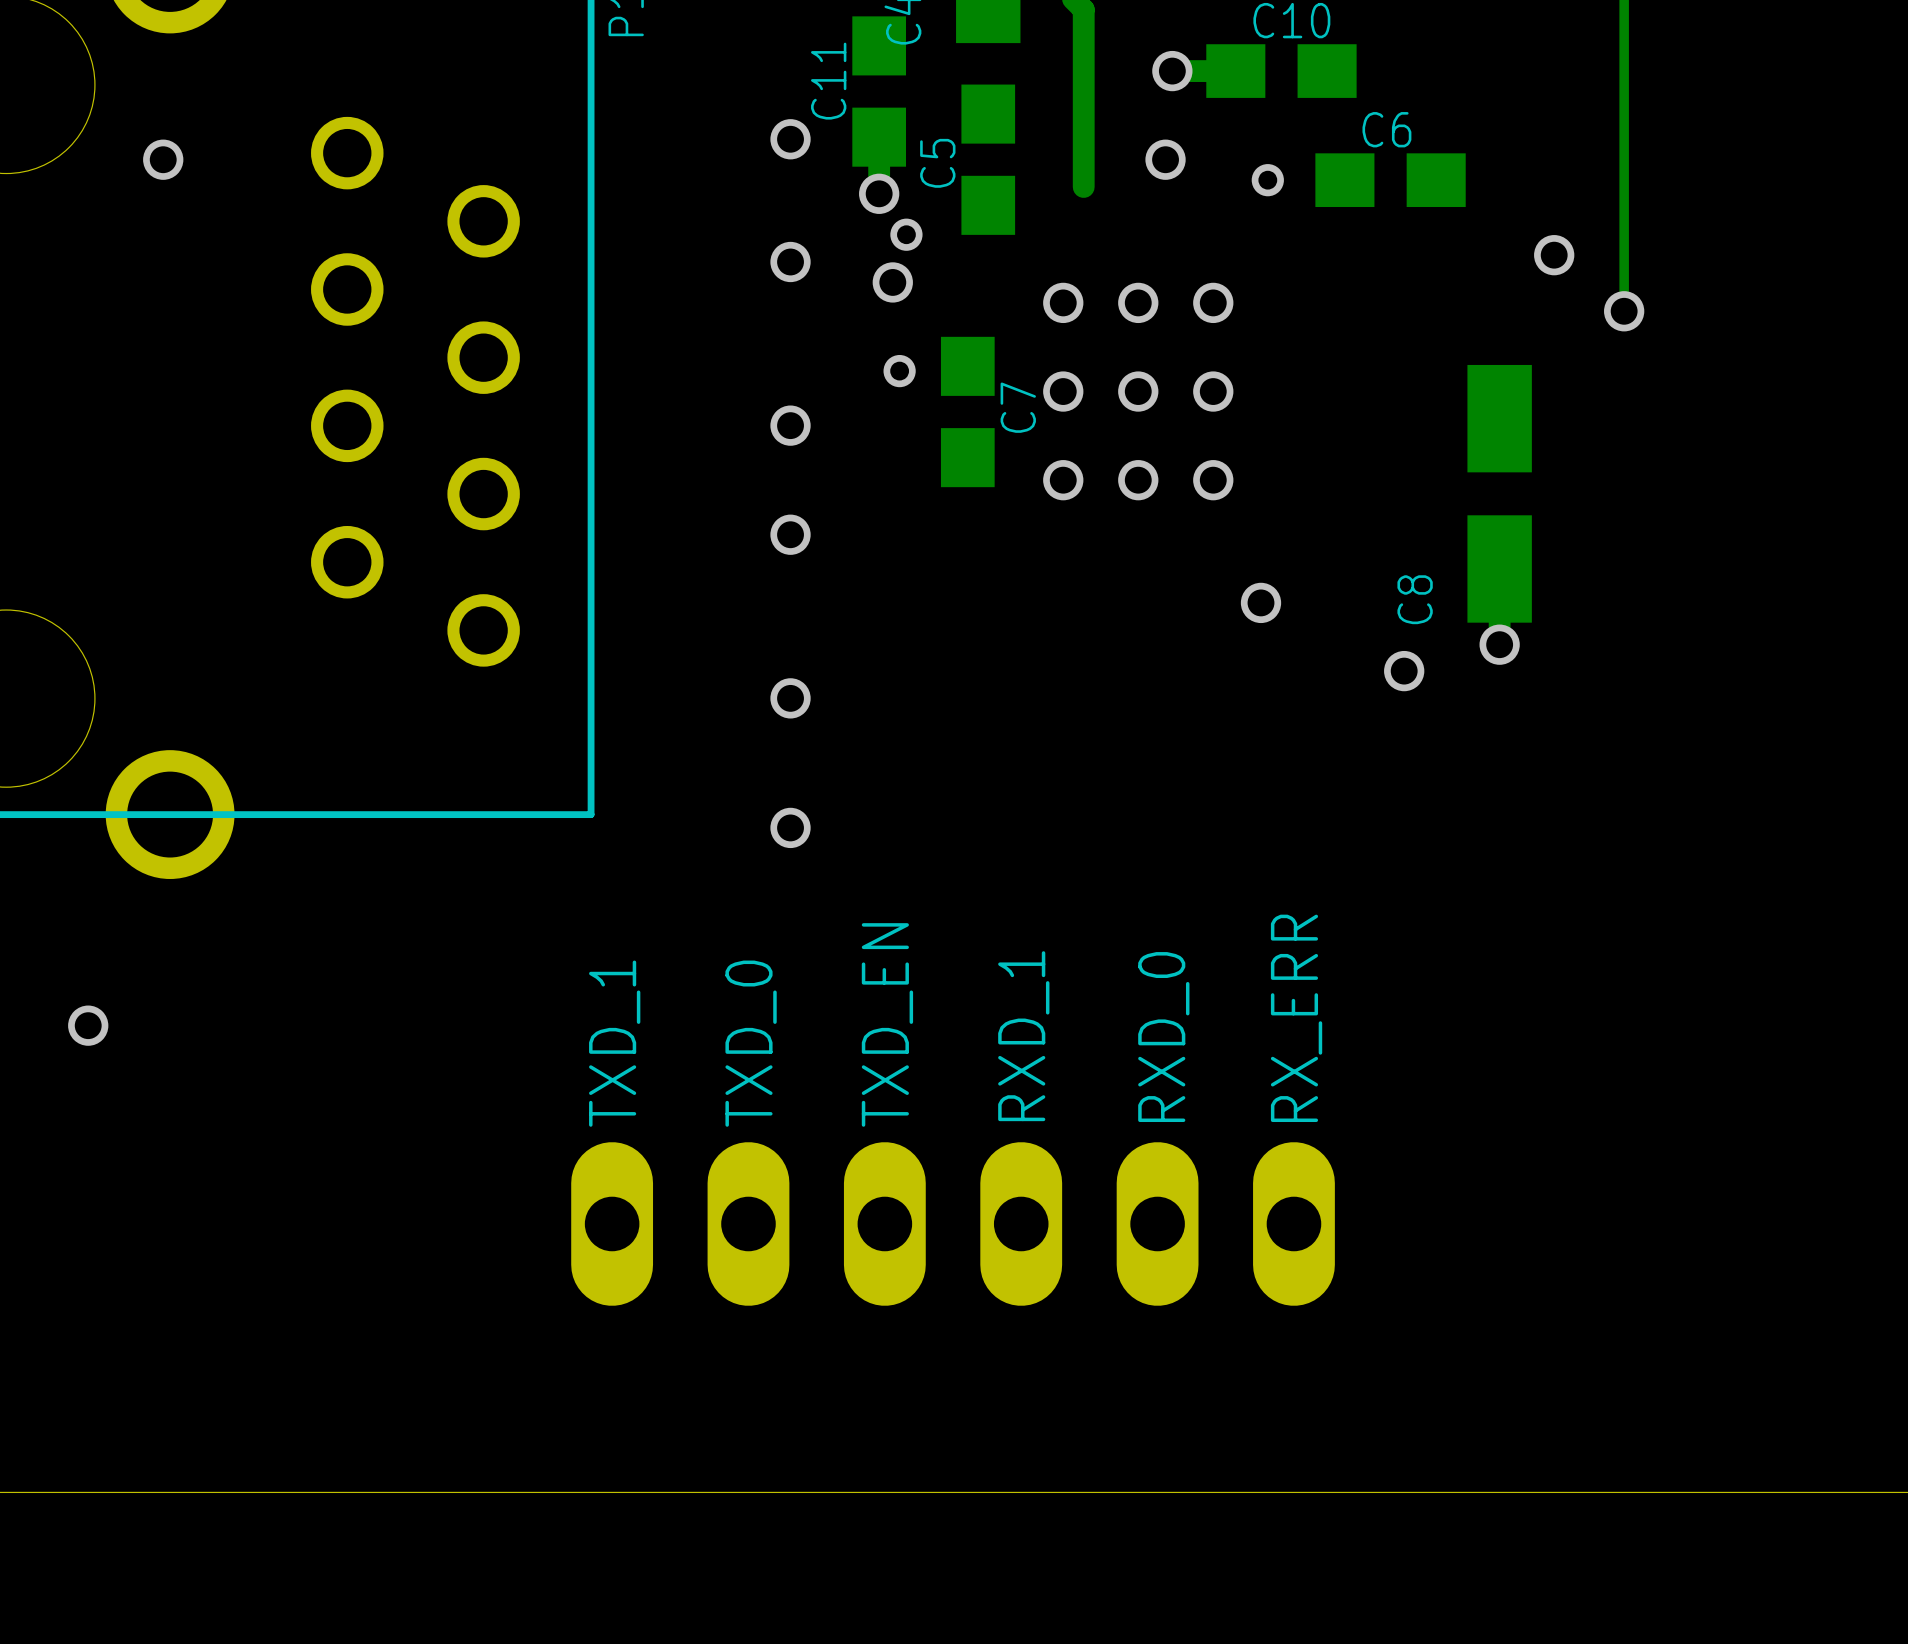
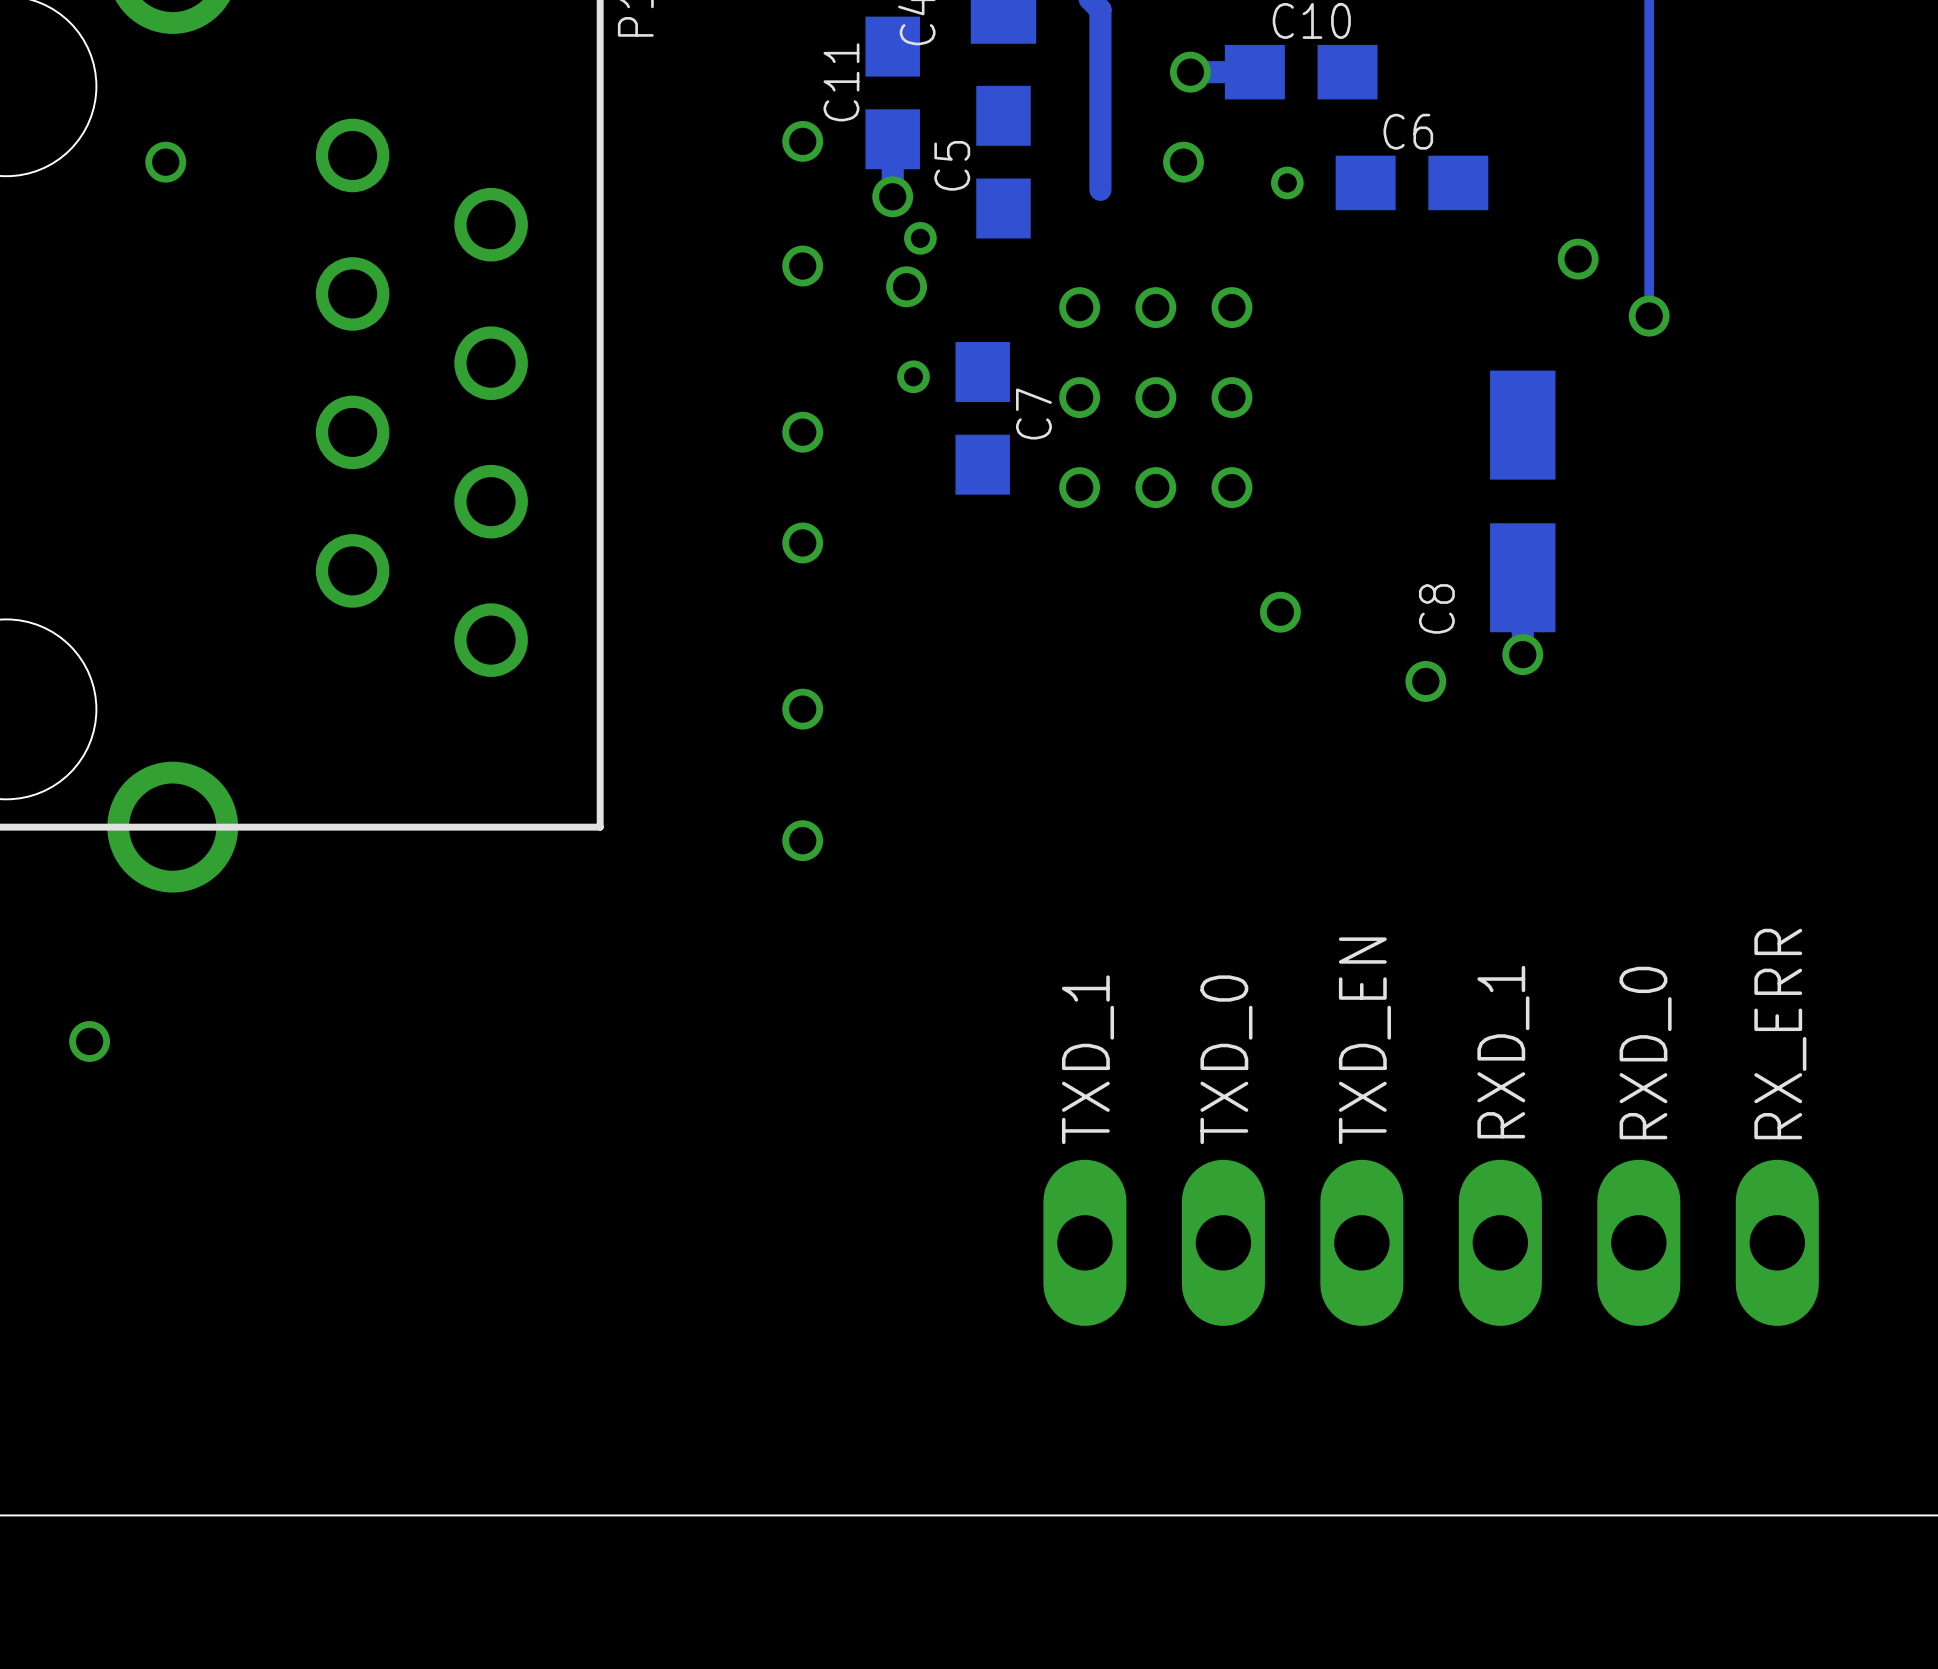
text position: RX_ERR (1296, 1018) -> RX_ERR (1780, 1034)
text position: TXD_EN (887, 1024) -> TXD_EN (1364, 1040)
text position: RXD_1 (1023, 1036) -> RXD_1 (1503, 1052)
text position: RXD_0 (1163, 1037) -> RXD_0 (1645, 1053)
text position: TXD_1 (614, 1043) -> TXD_1 (1088, 1059)
text position: TXD_0 (751, 1043) -> TXD_0 (1226, 1059)
part position: (953, 1223) -> (1431, 1242)

